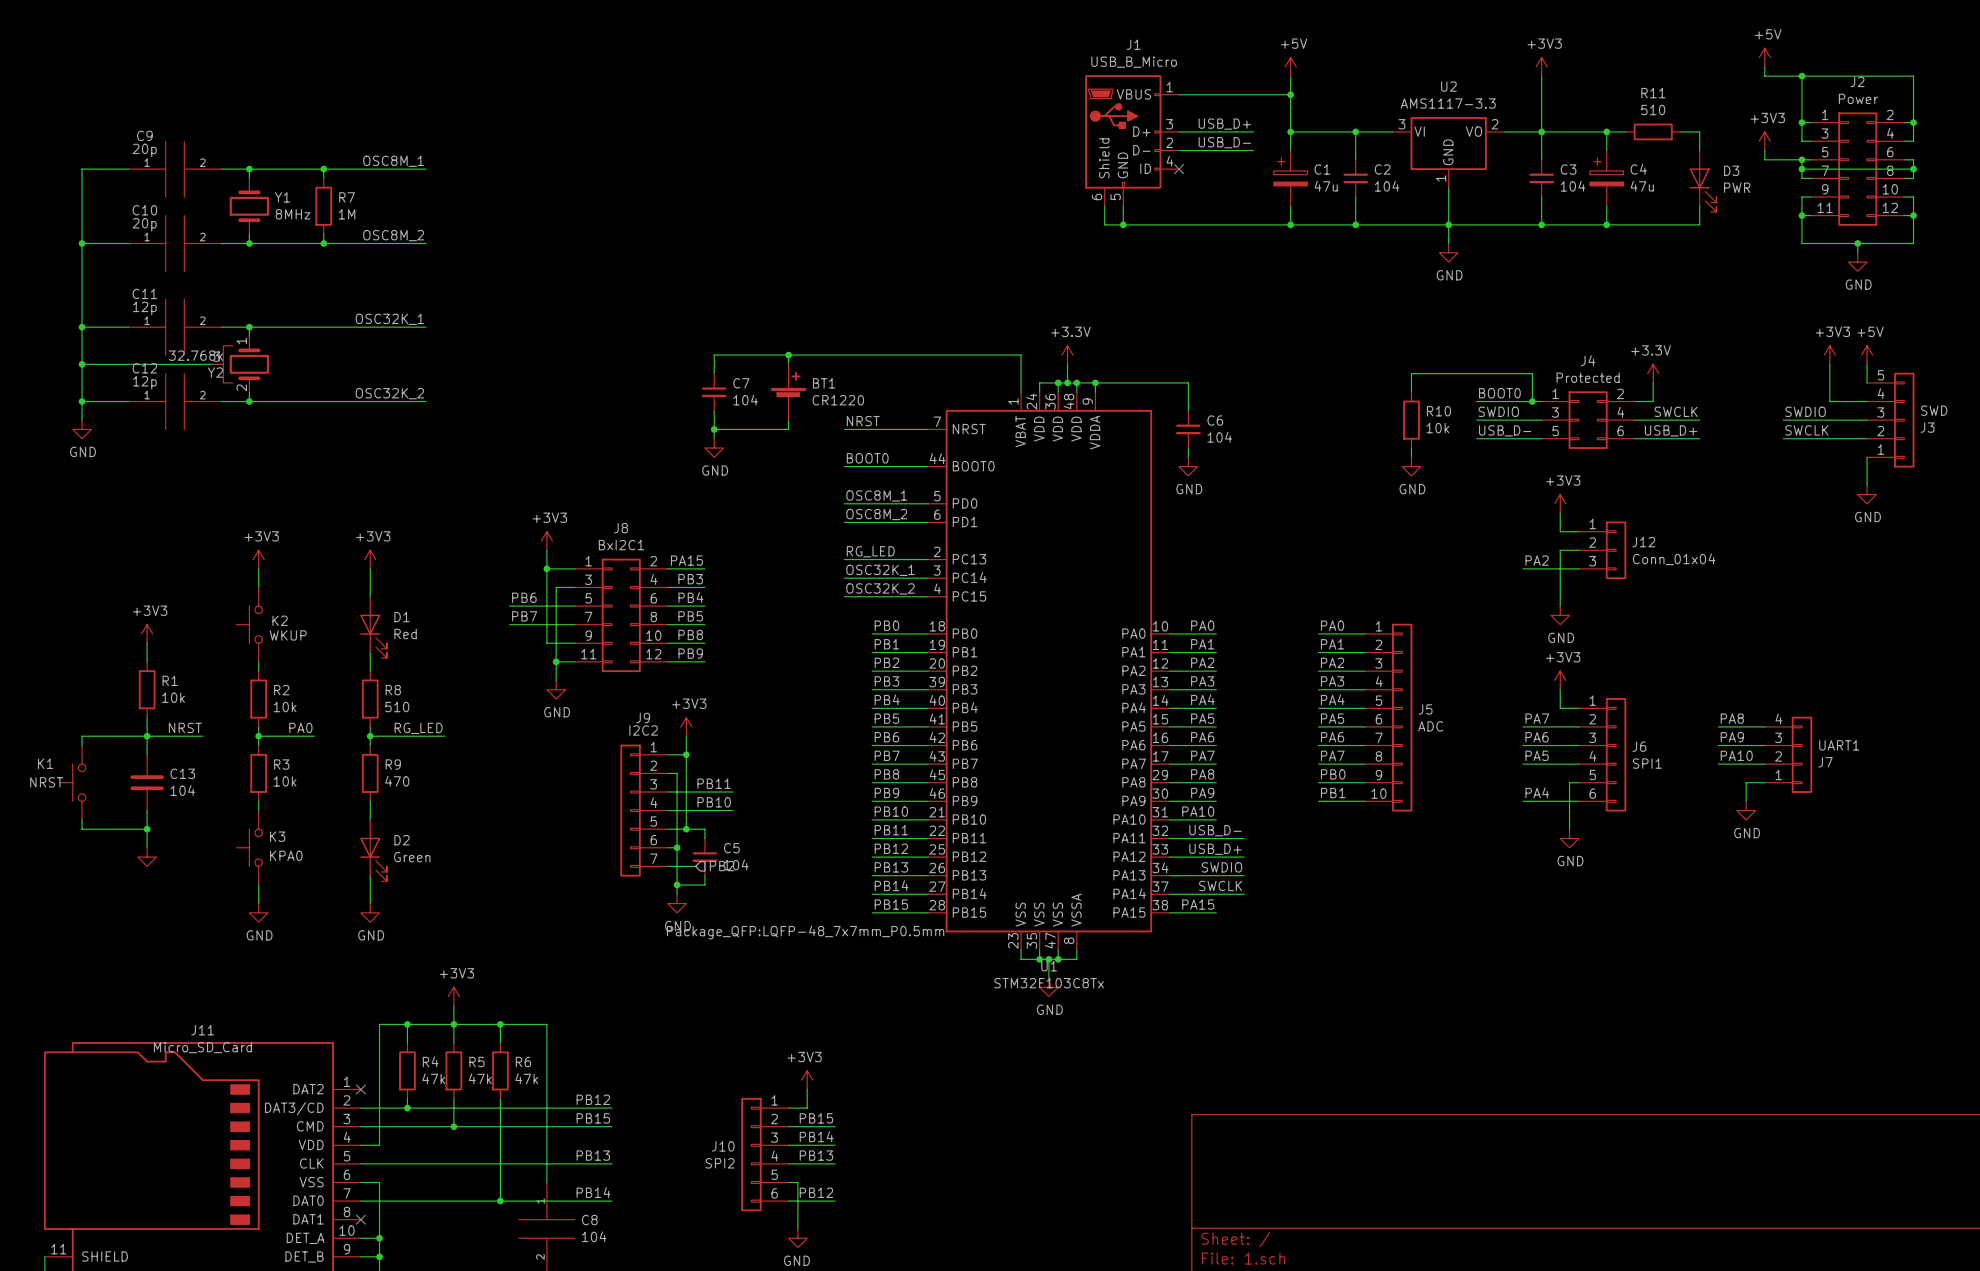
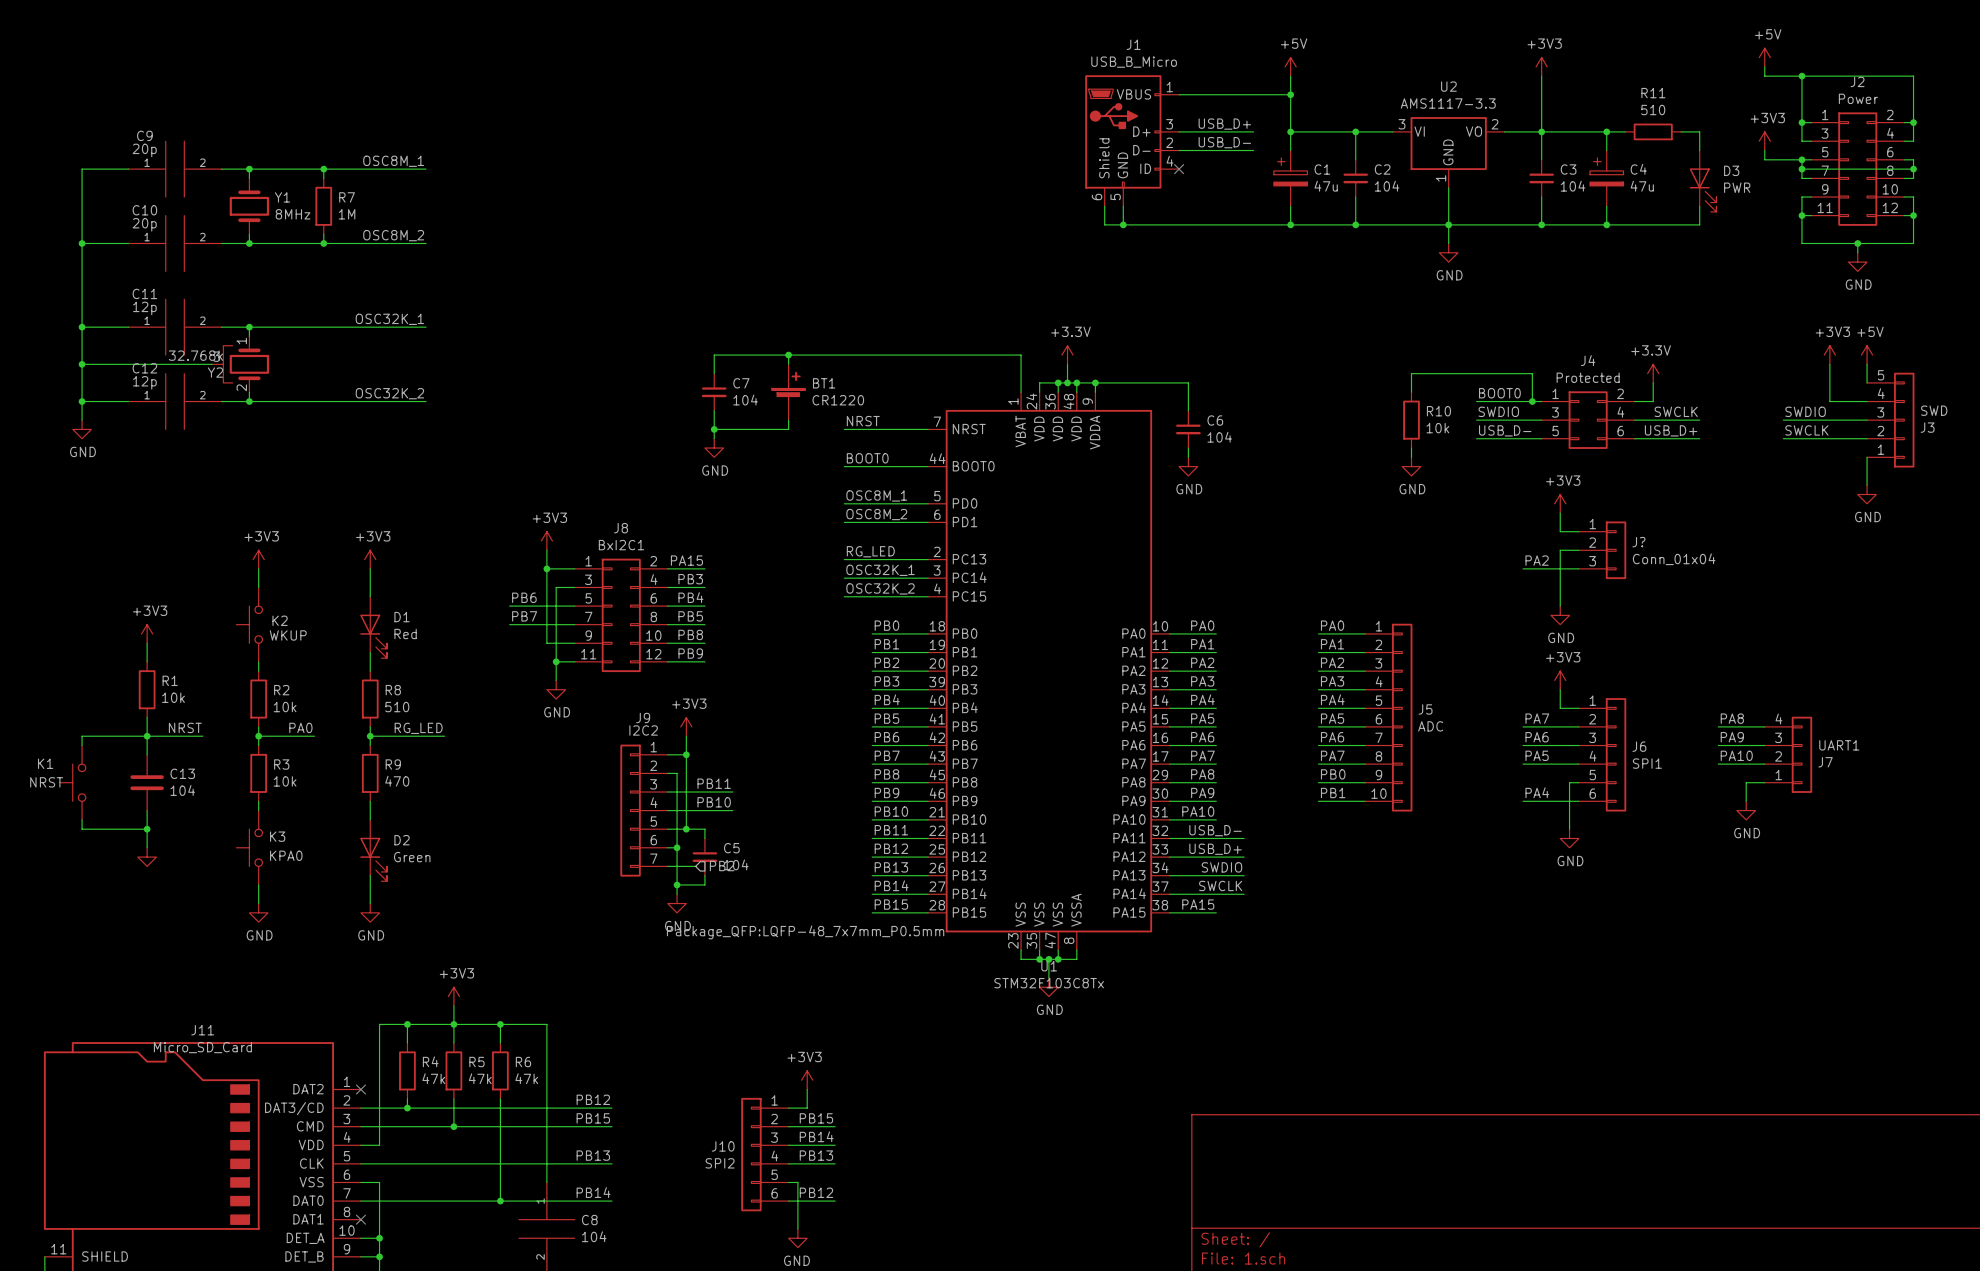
J12 name: J12 (1643, 542) -> J? (1638, 542)

